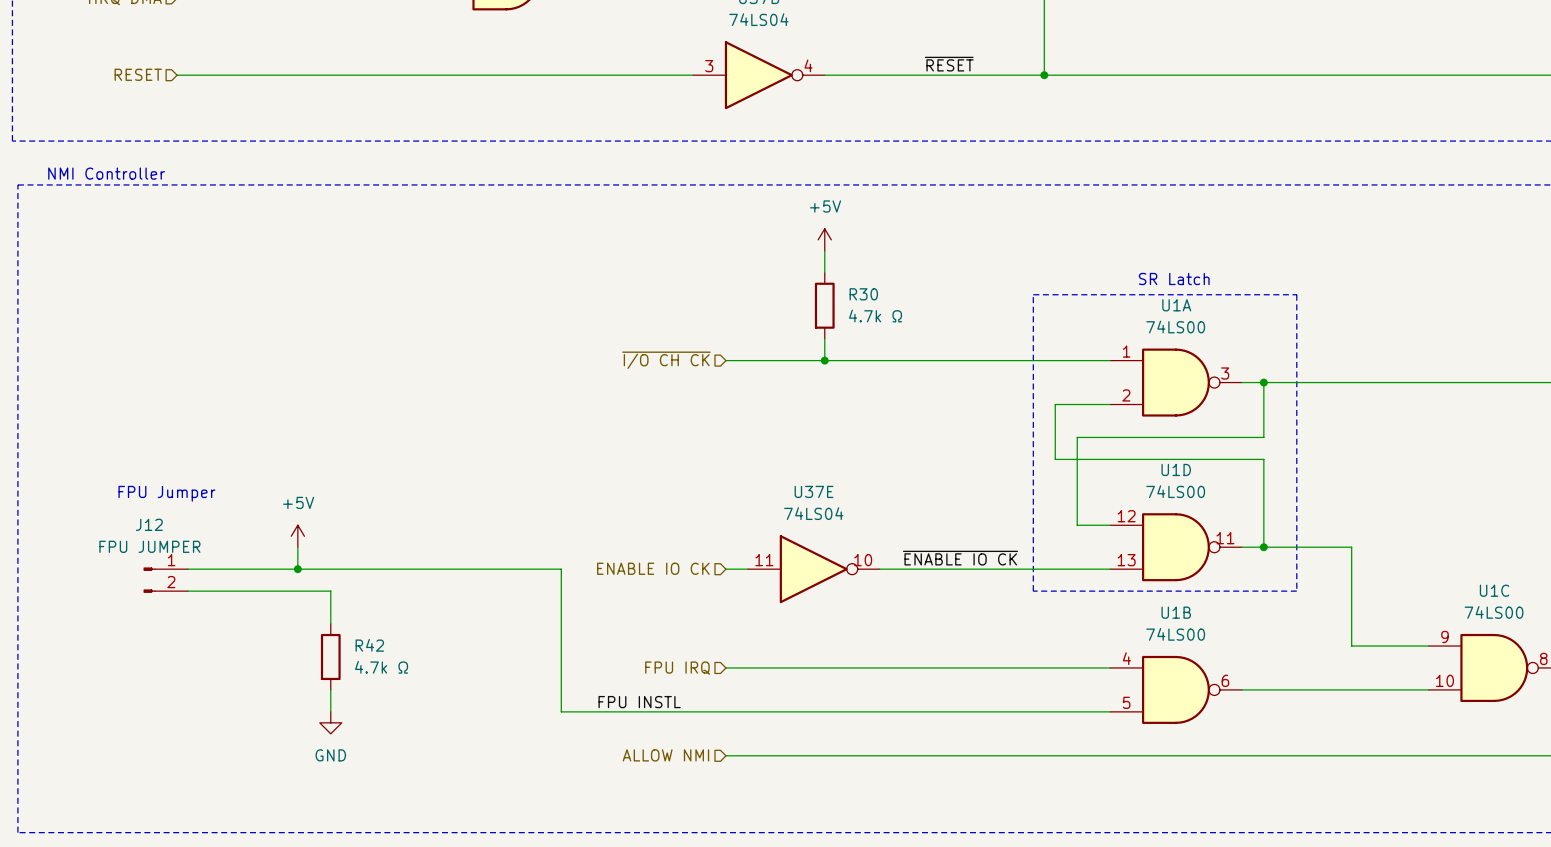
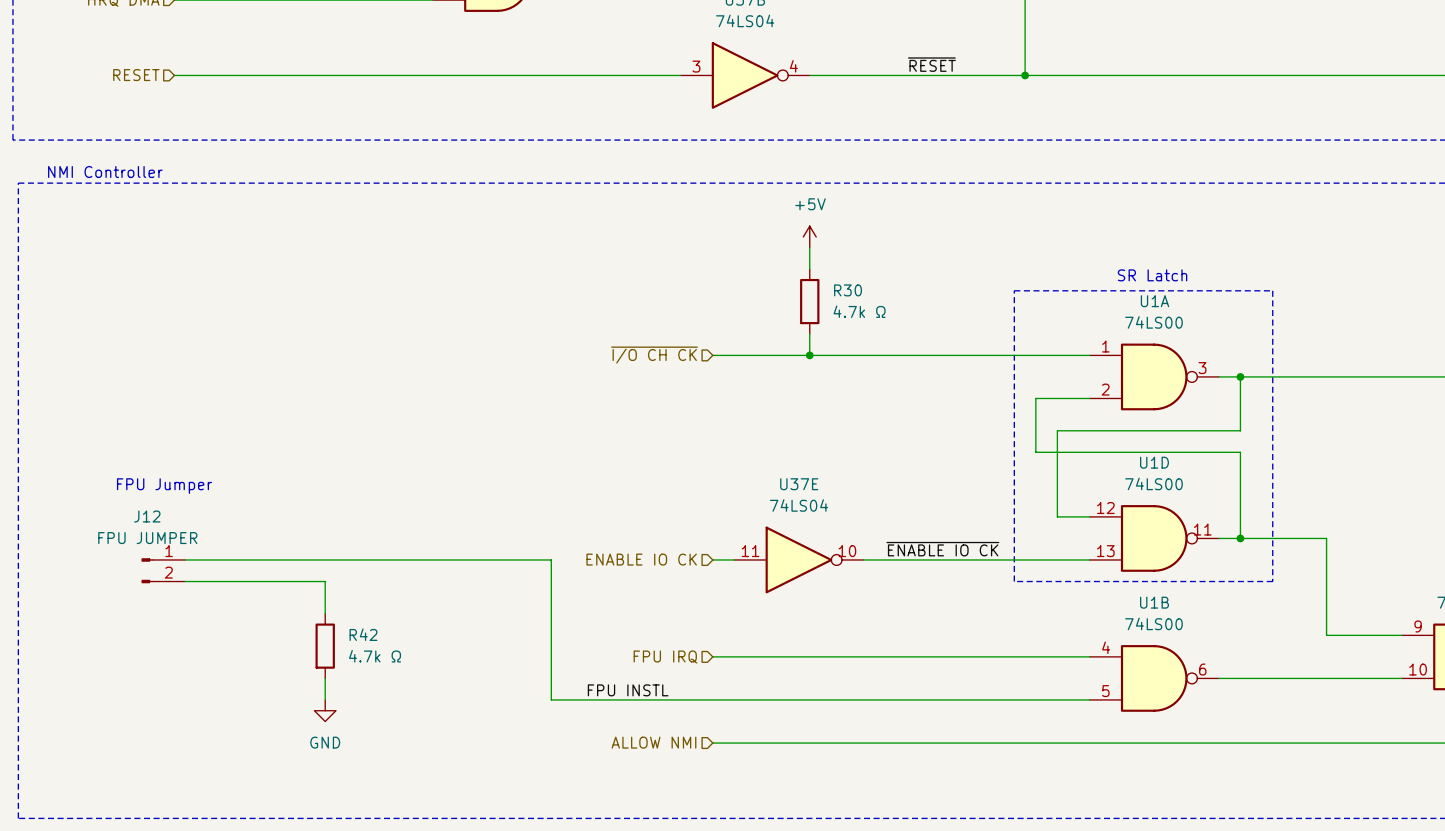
power symbol: +5V (297, 536) -> none
wire: (297, 547) (297, 569) -> none
junction: (297, 569) -> none

